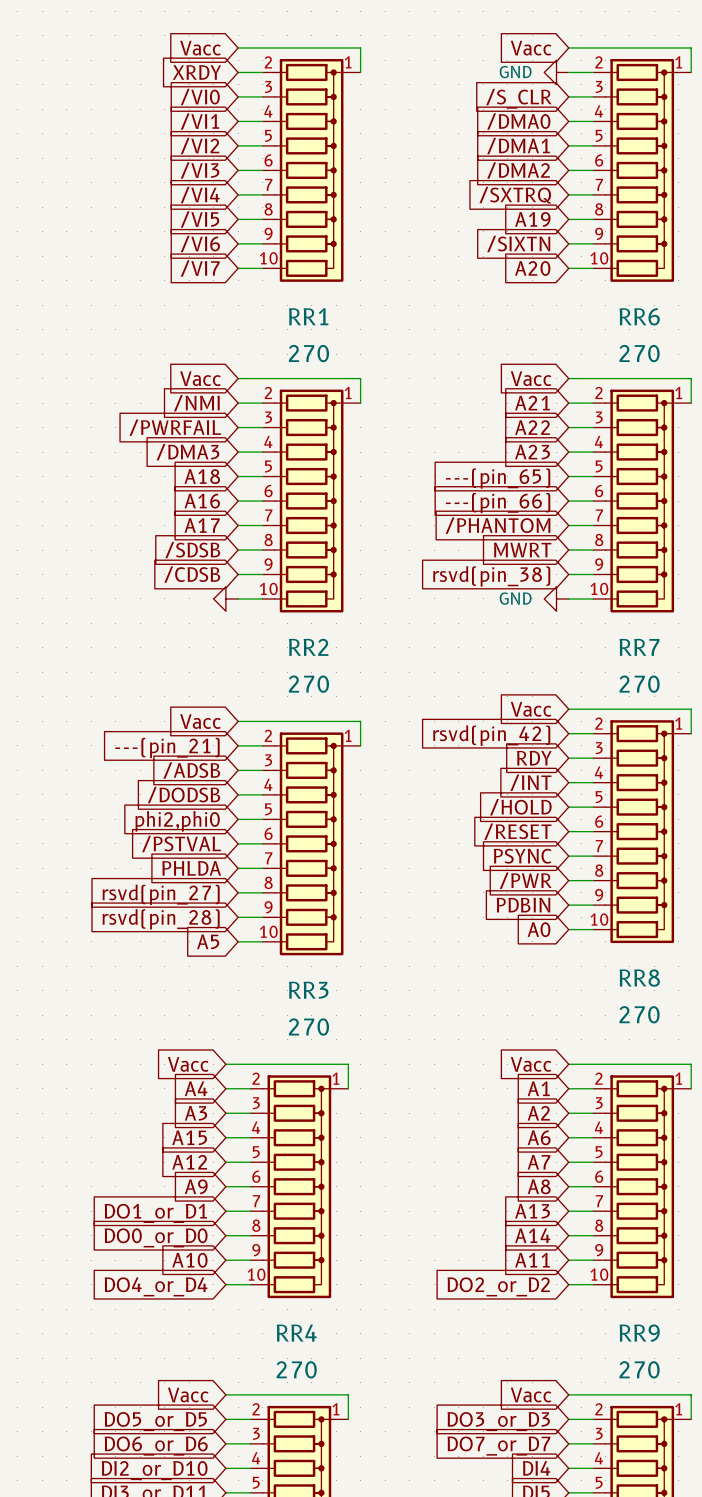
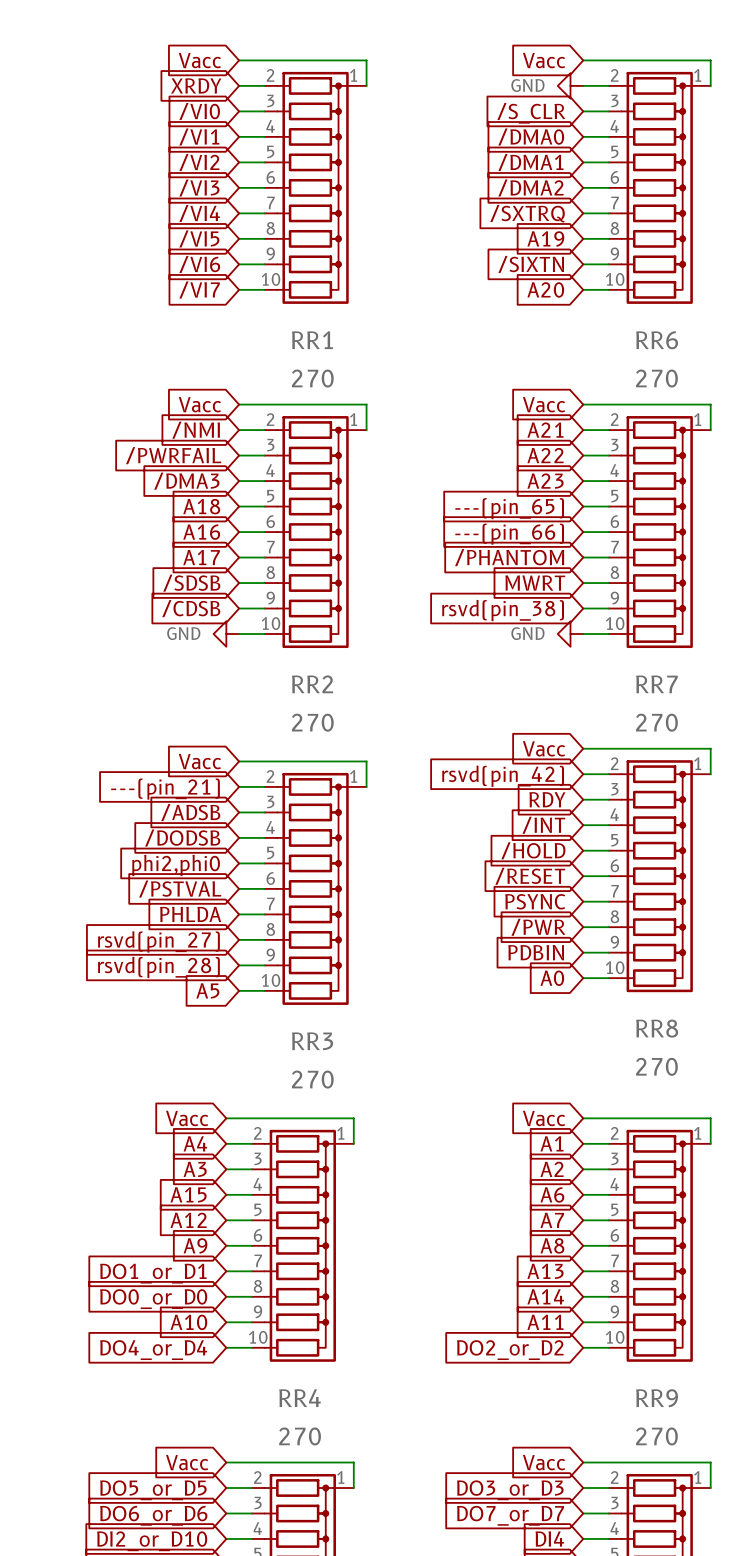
power symbol text: none -> GND (183, 633)

